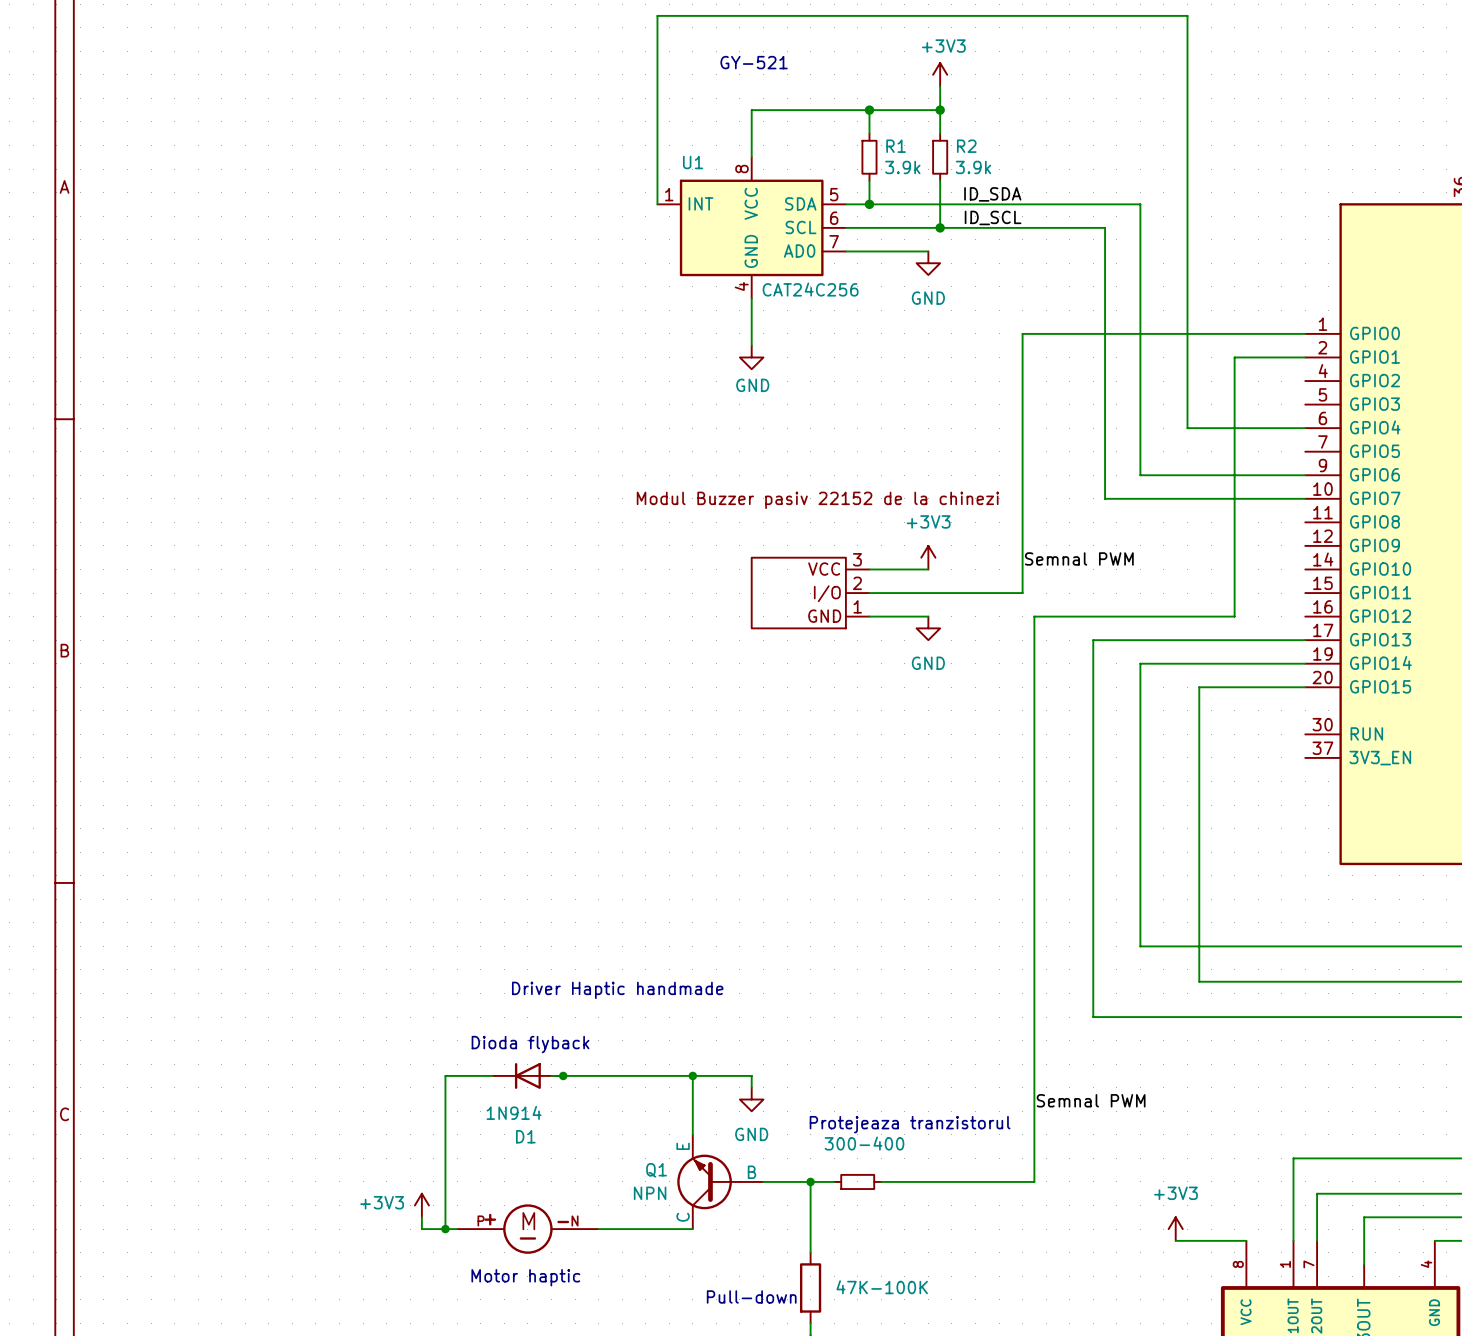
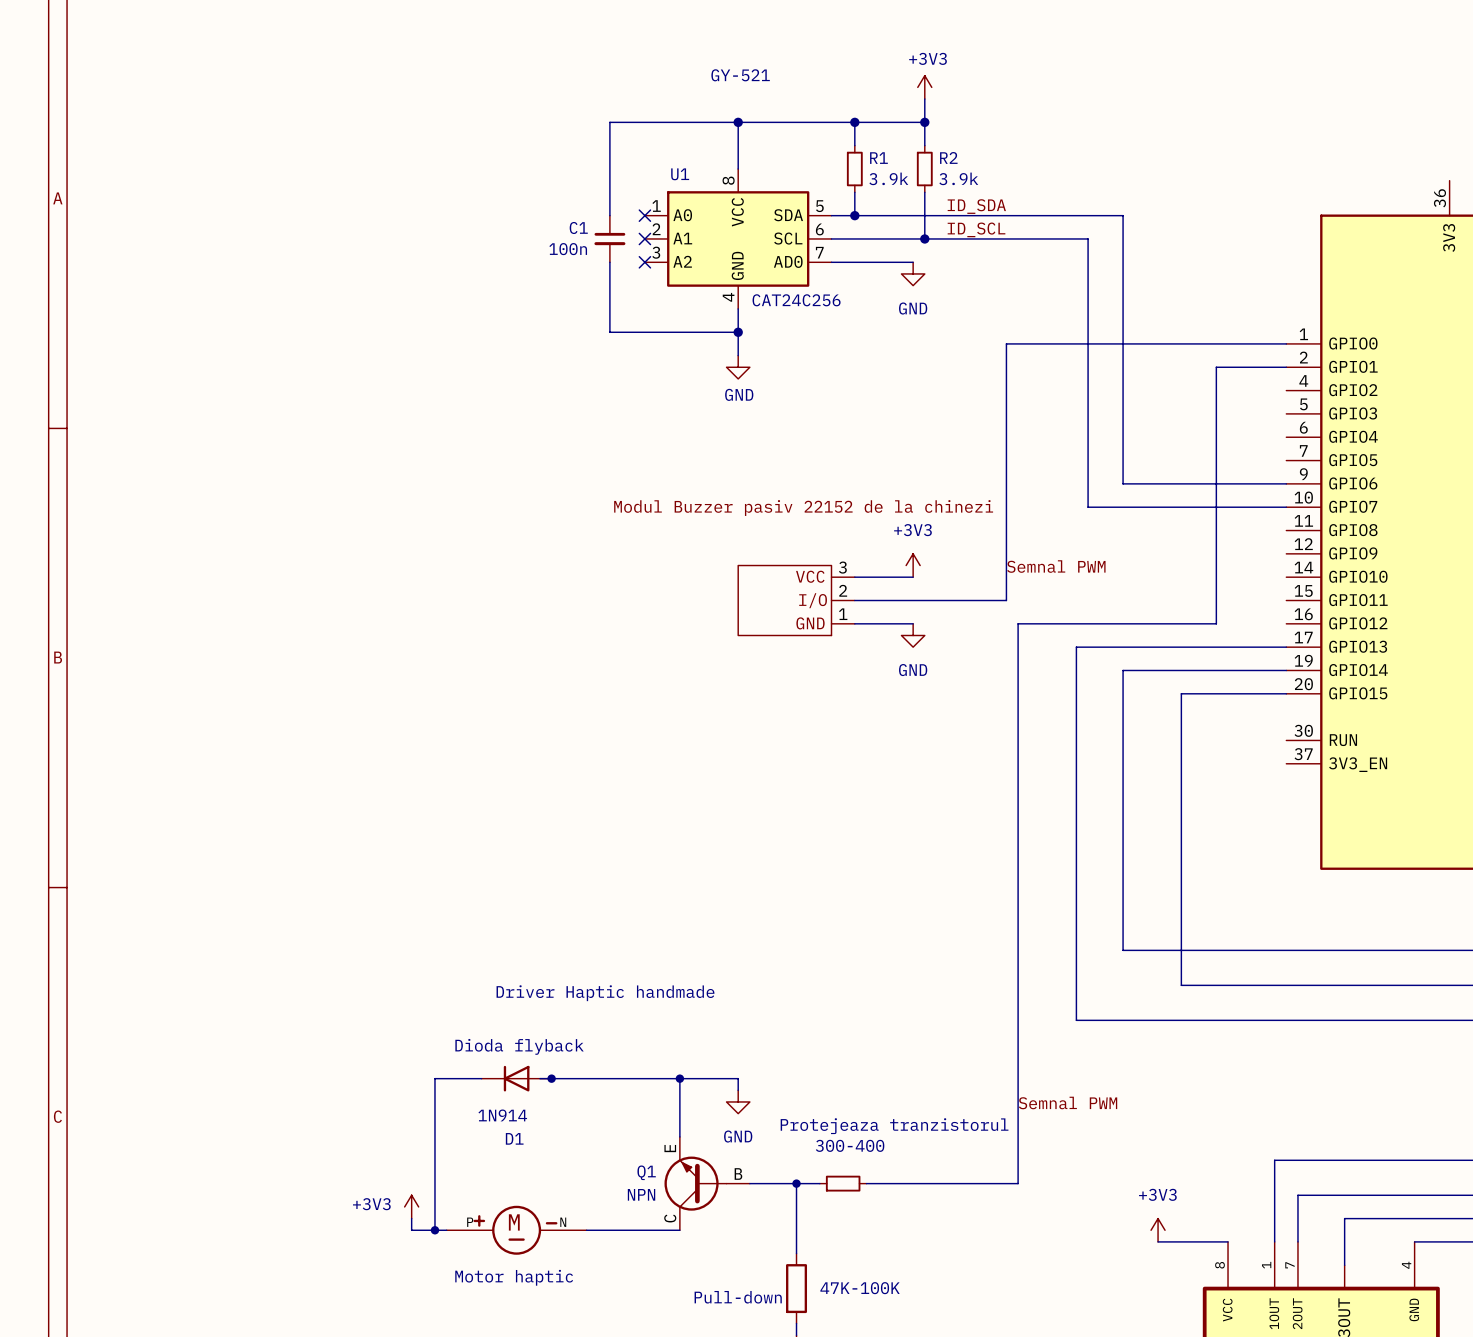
wire: none -> (738, 122) (609, 122) (609, 215)
junction: none -> (738, 122)
U1 symbol: [657, 157, 846, 299] -> [644, 169, 832, 309]
wire: (657, 204) (657, 15) (1187, 15) (1187, 428) (1305, 428) -> none
no-connect mark: none -> (644, 215)
C1: none -> 100n (609, 238)
no-connect mark: none -> (644, 238)
wire: none -> (609, 262) (609, 332) (738, 332)
no-connect mark: none -> (644, 262)
junction: none -> (738, 332)

